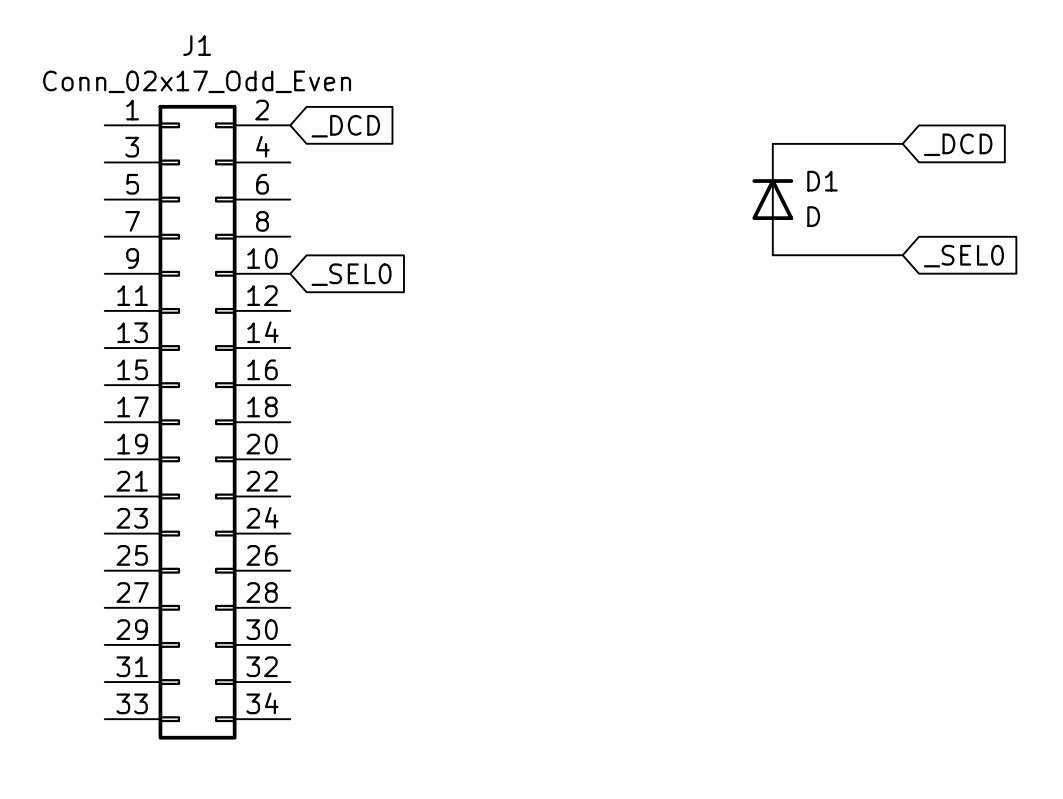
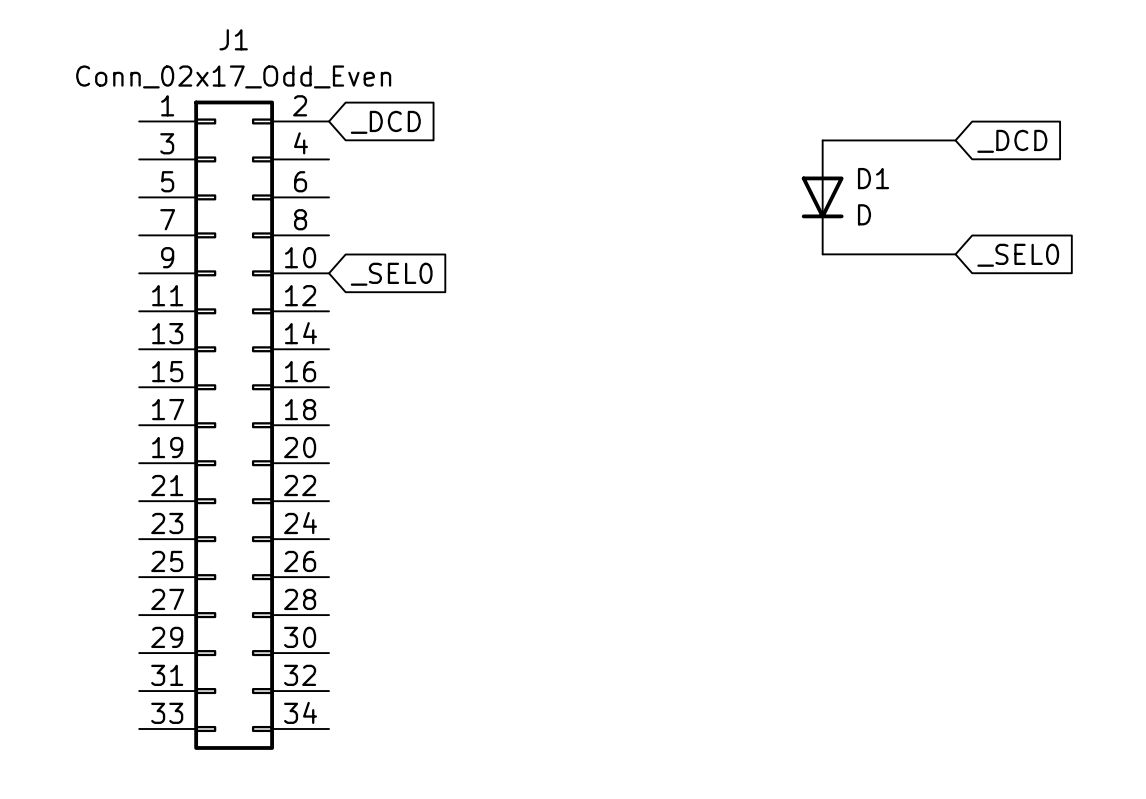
D1 rotation: 0° (772, 199) -> 180° (822, 197)

